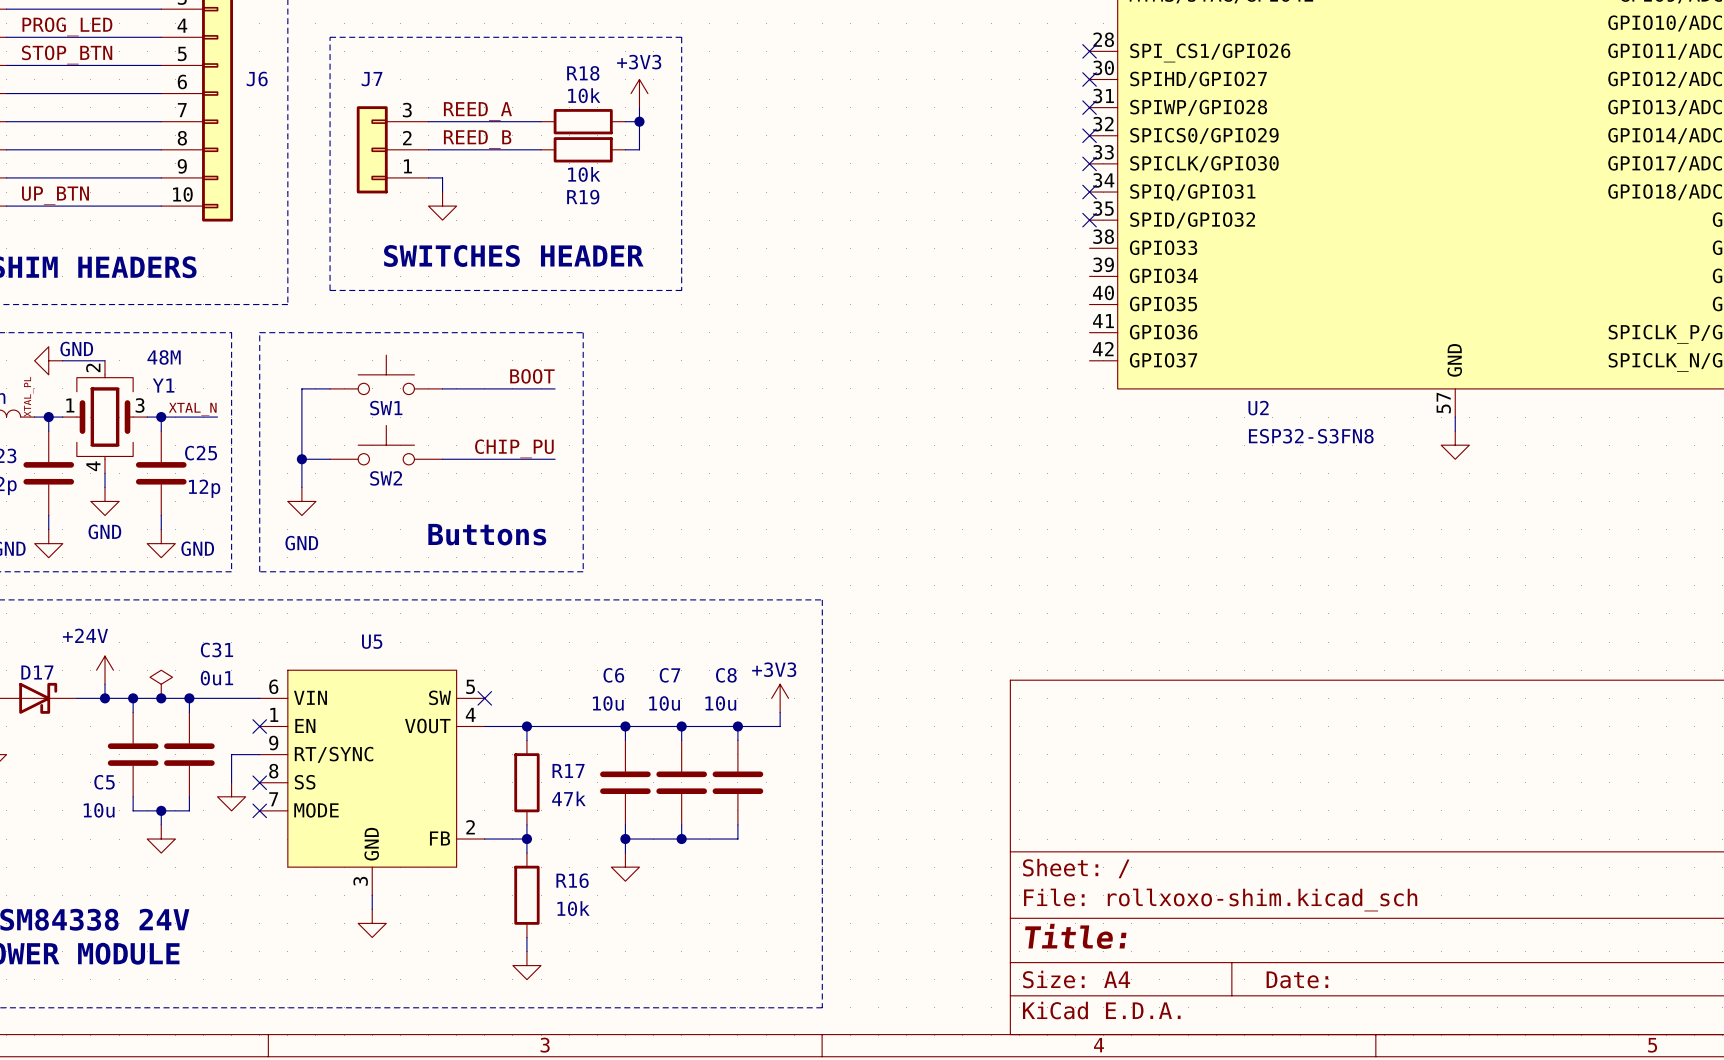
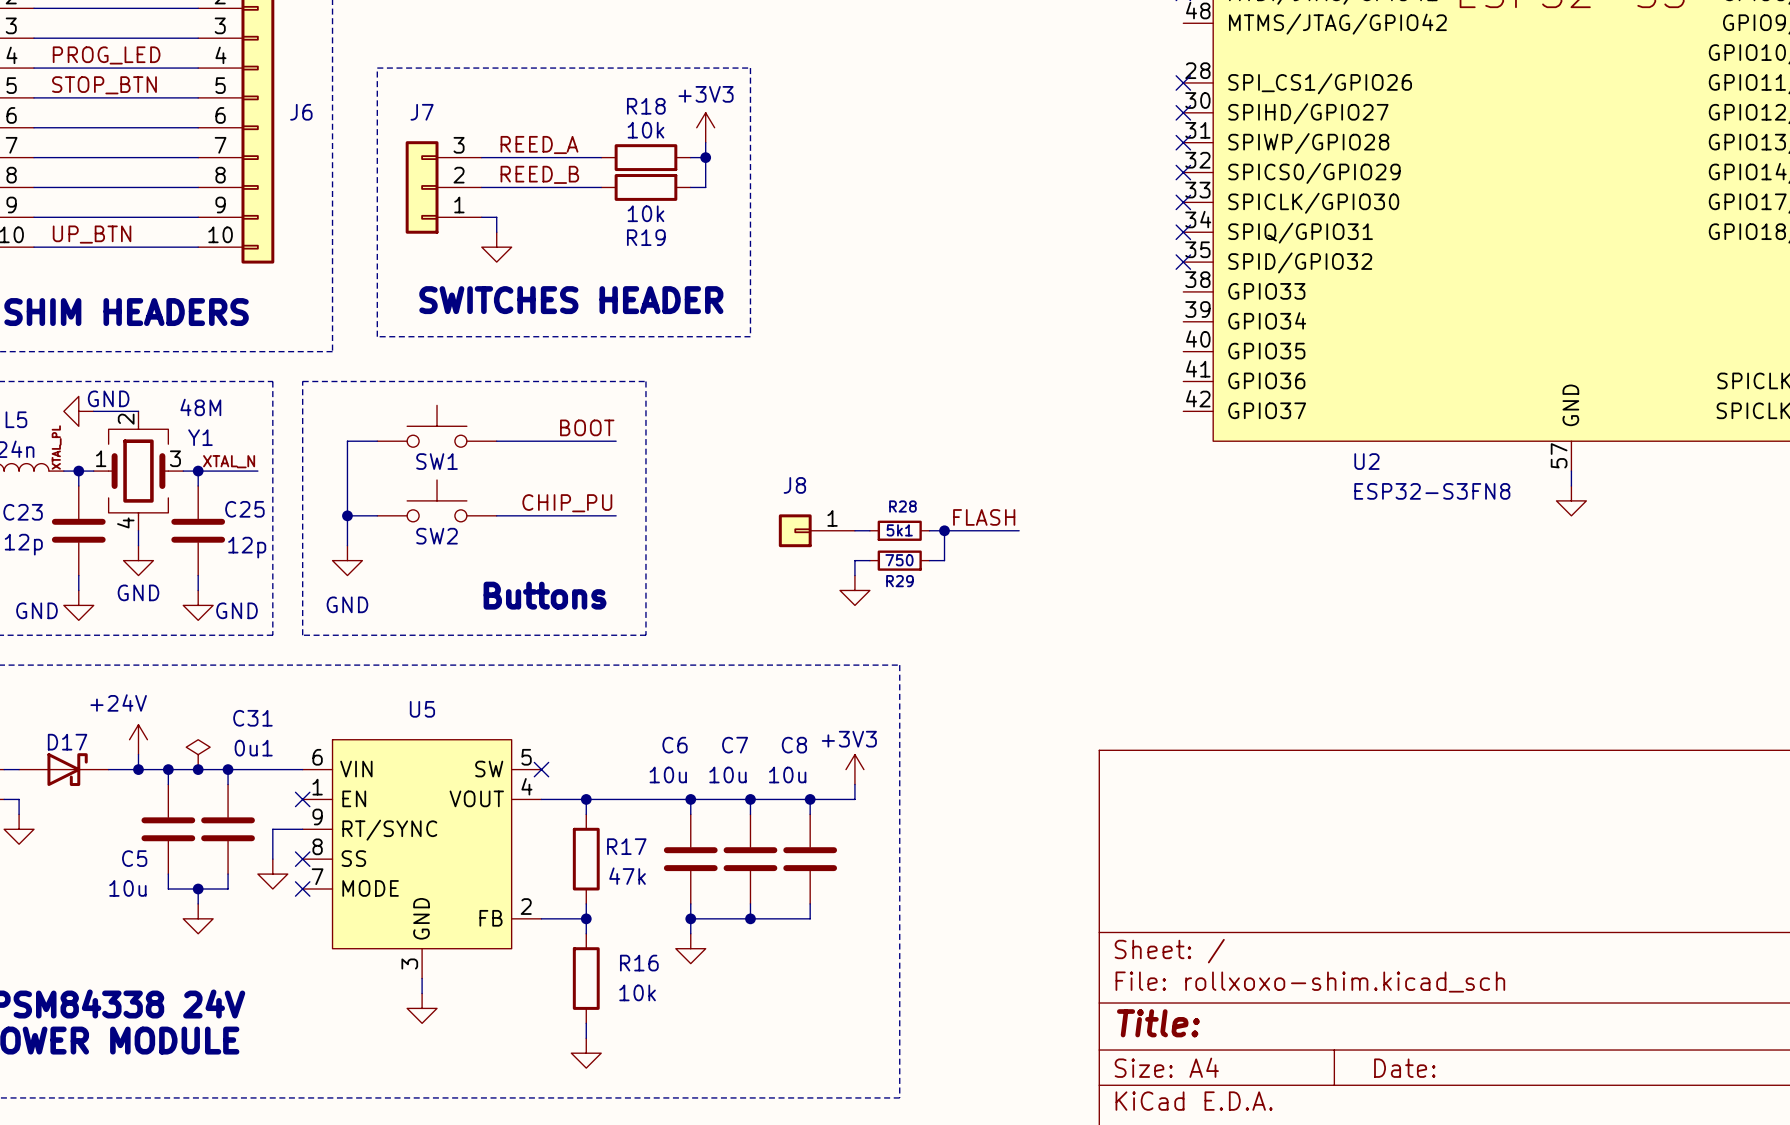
label: none -> FLASH (984, 517)
J8: none -> (816, 530)
wire: none -> (854, 530) (869, 530)
R28: none -> 5k1 (899, 530)
wire: none -> (929, 530) (1019, 530)
wire: none -> (944, 530) (944, 560) (929, 560)
junction: none -> (944, 530)
wire: none -> (869, 560) (854, 560) (854, 575)
R29: none -> 750 (899, 560)
power symbol: none -> (854, 590)

